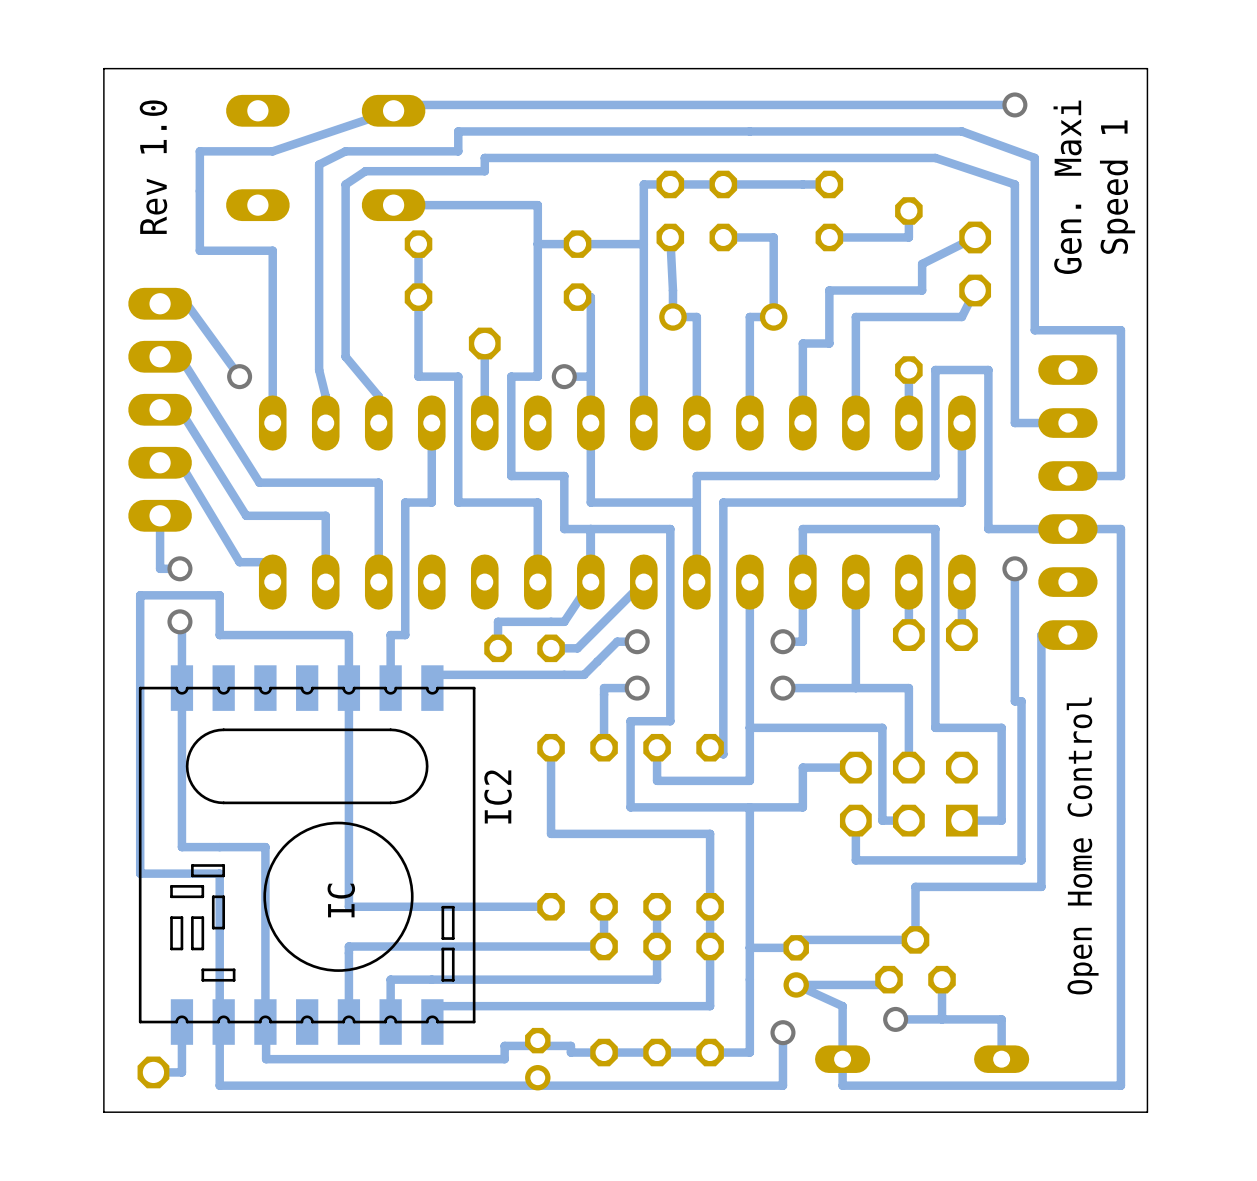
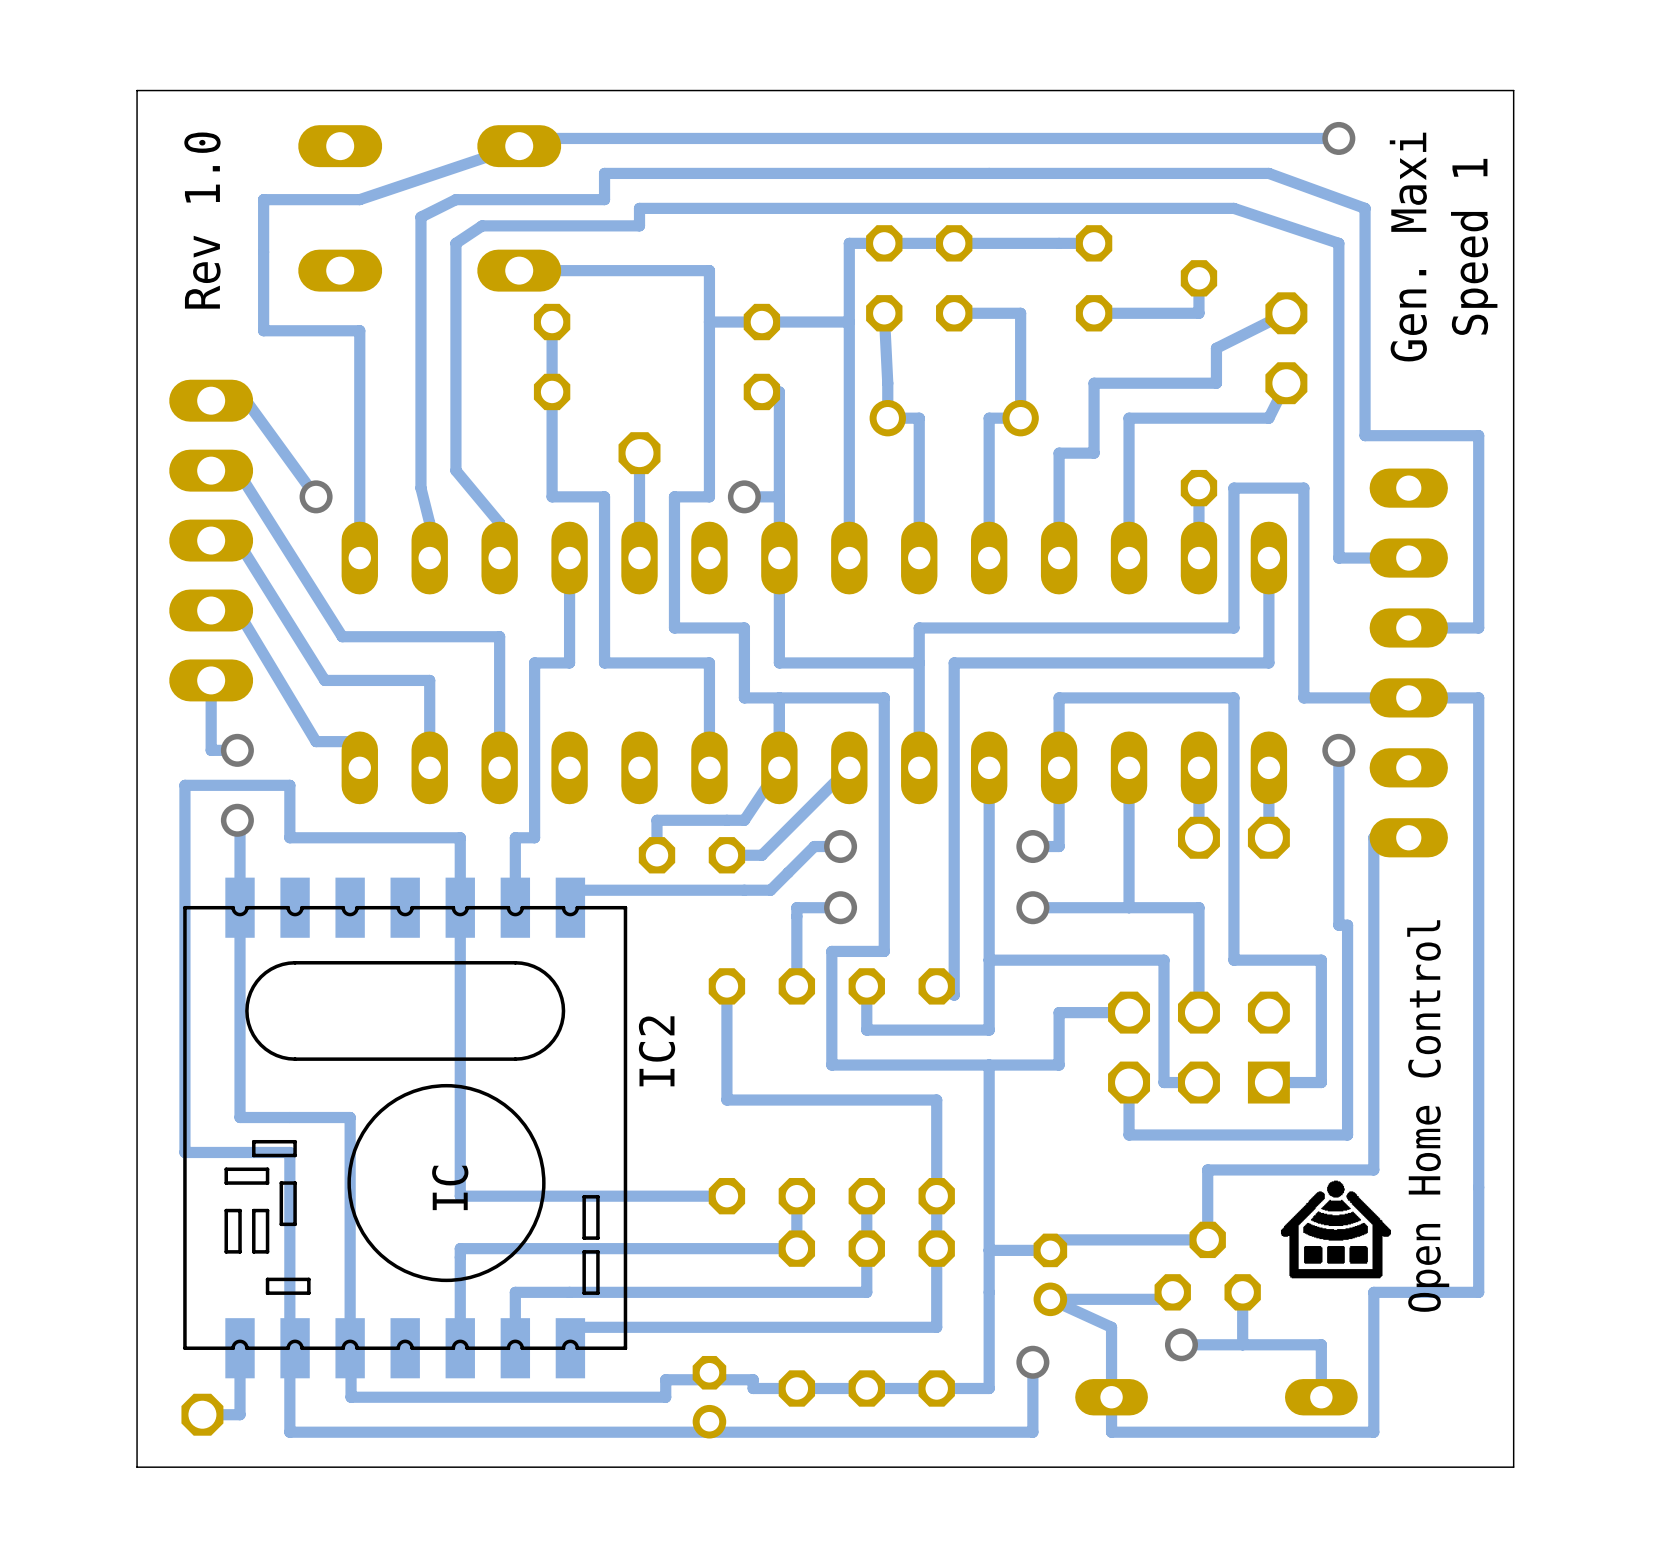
drawing: none -> [1280, 1180, 1391, 1279]
track: (1120, 979) (1120, 1085) (1041, 1085) -> (1478, 1292) (1373, 1292) (1373, 1432)

